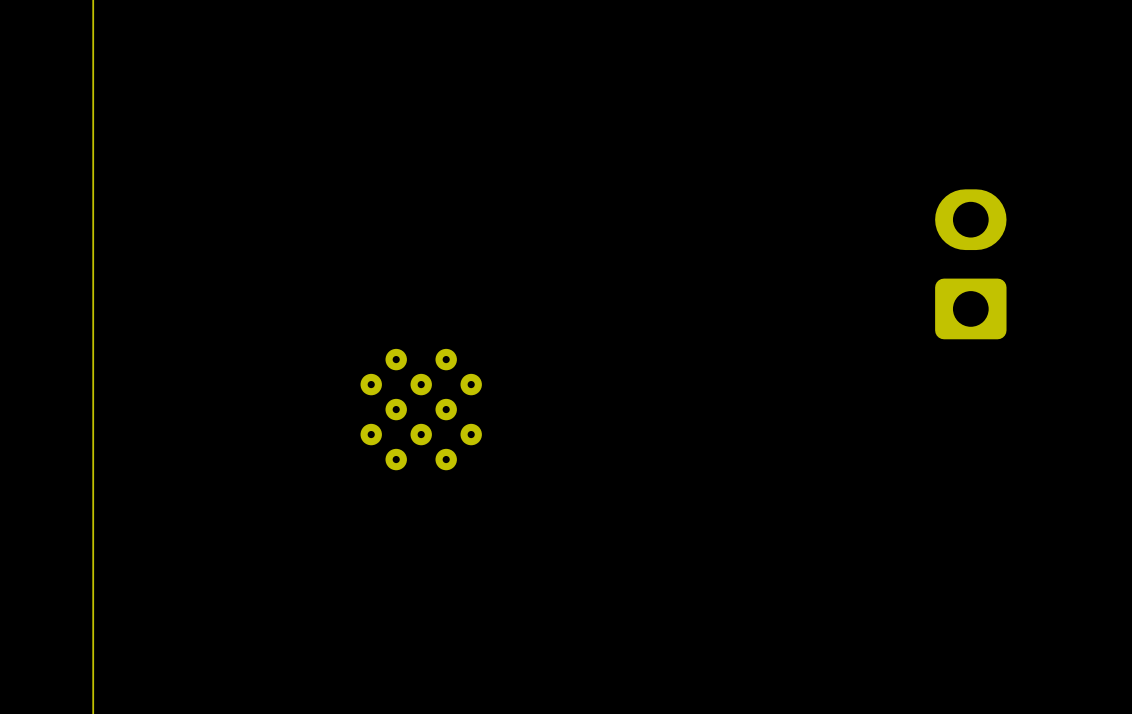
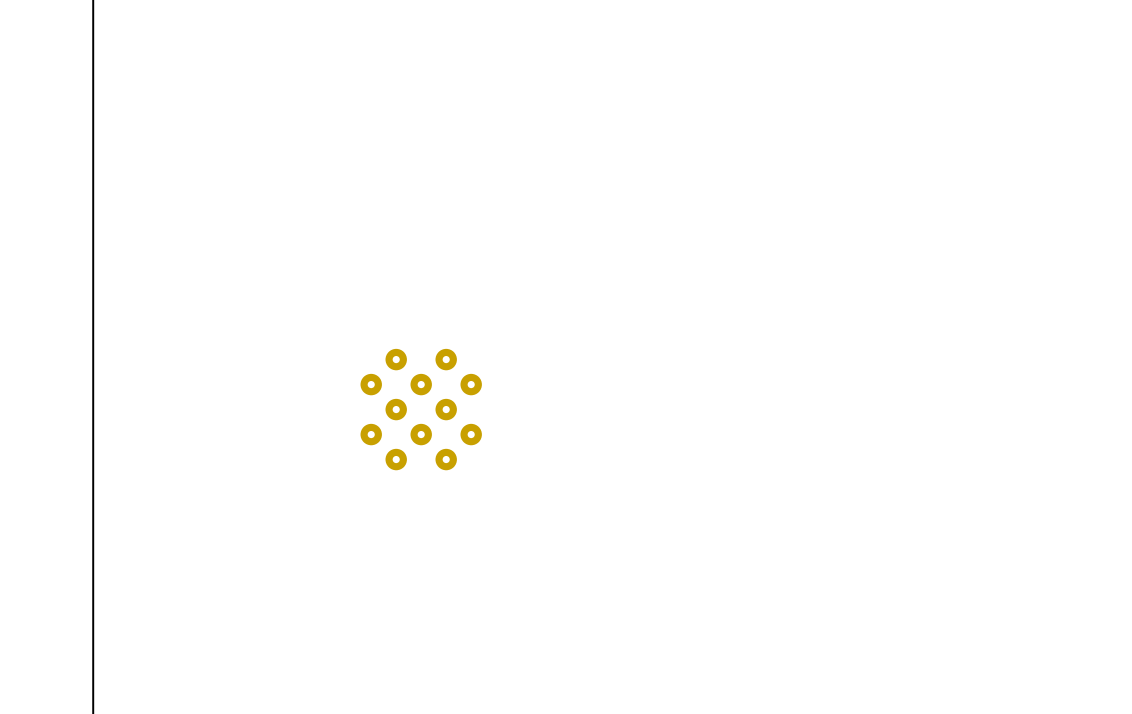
part: (970, 264) -> none

